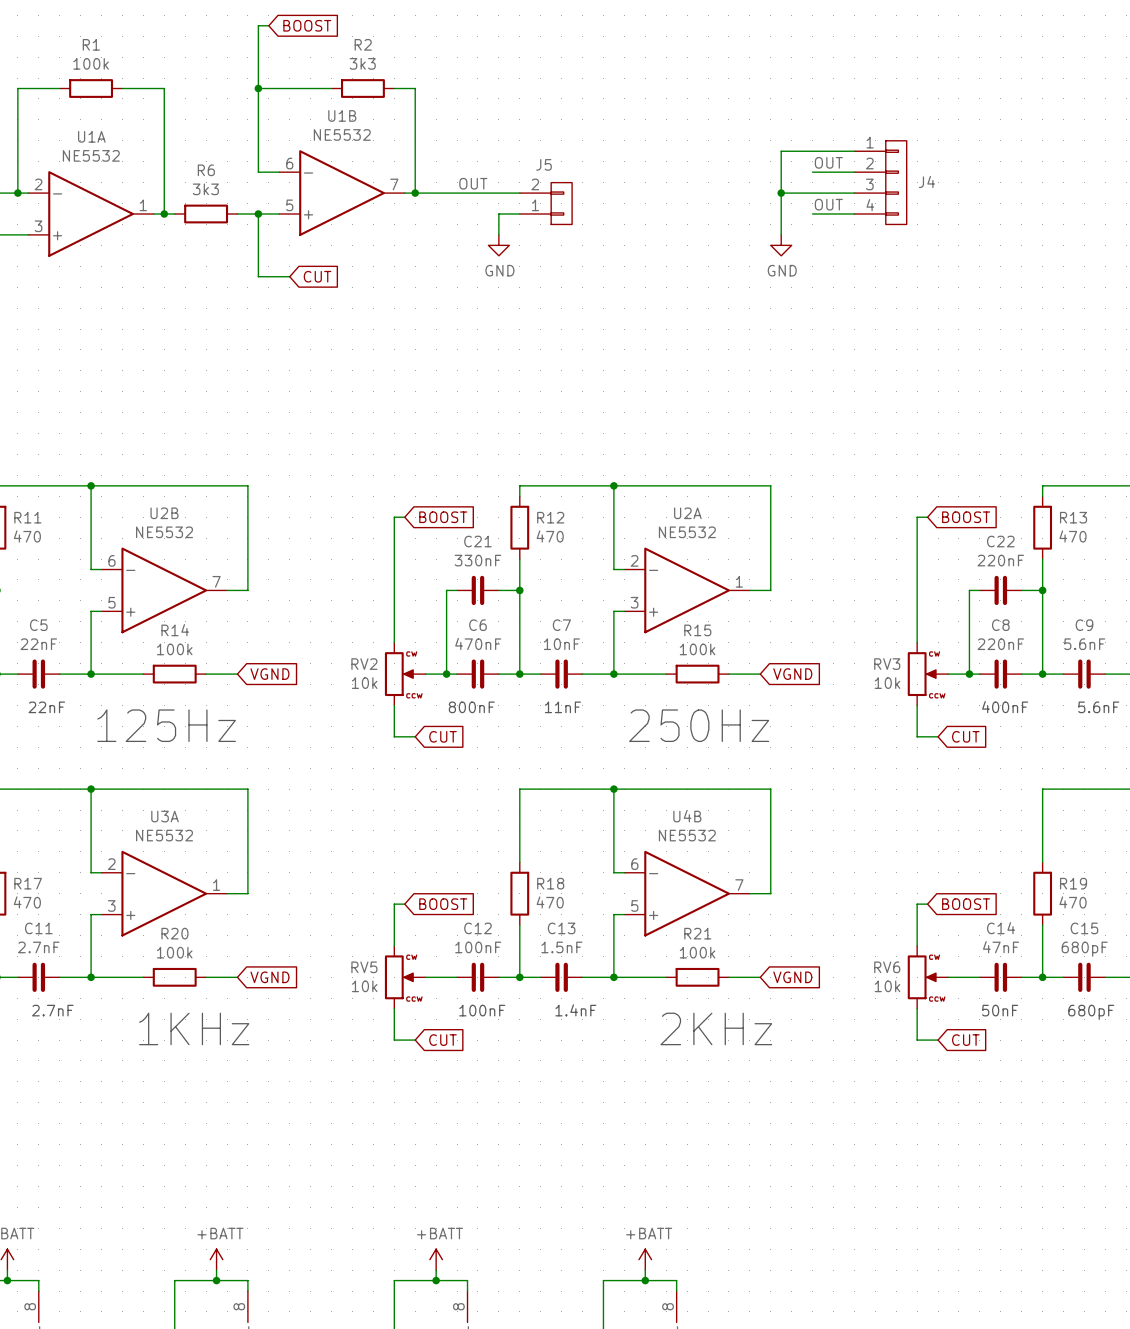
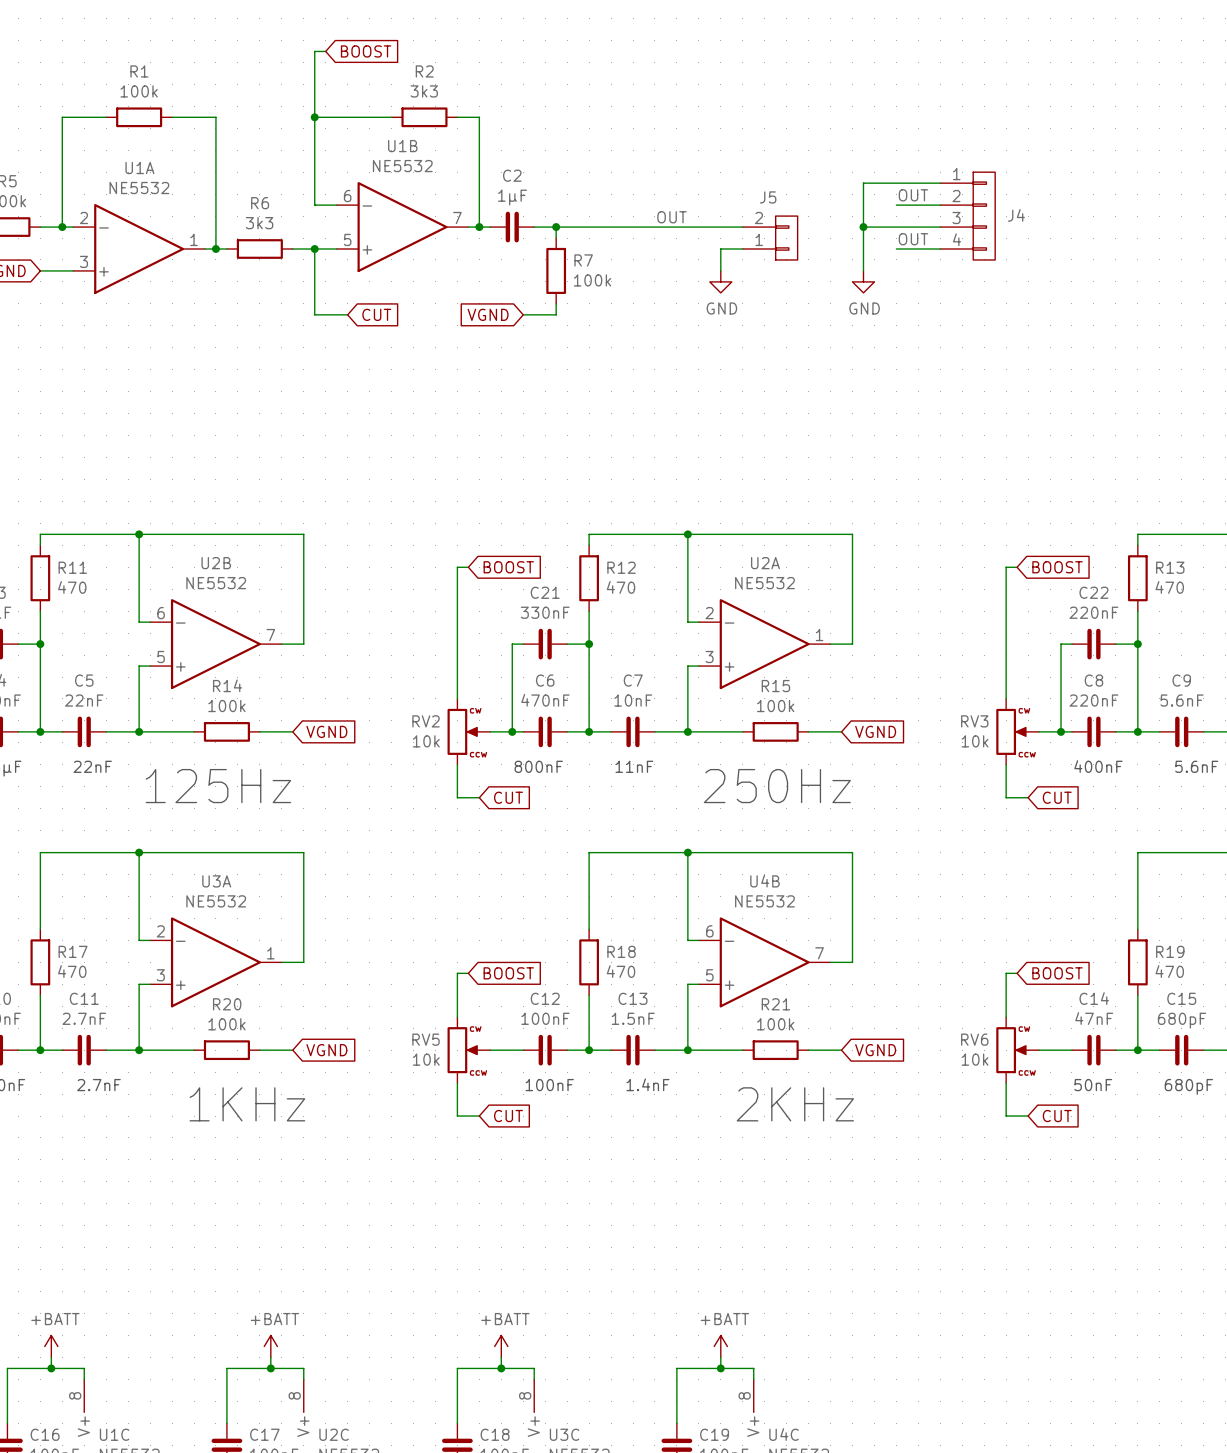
label position: OUT (473, 183) -> OUT (672, 217)
C2: none -> 1μF (512, 227)
wire: none -> (556, 227) (556, 238)
junction: none -> (556, 227)
wire: none -> (589, 227) (742, 227)
J5 position: (545, 203) -> (770, 238)
wire: (519, 213) (498, 213) (498, 234) -> (742, 249) (720, 249) (720, 270)
R7: none -> 100k (556, 270)
power symbol position: GND (498, 245) -> GND (720, 281)
wire: none -> (556, 303) (556, 314) (523, 314)
global label: none -> VGND (488, 314)

